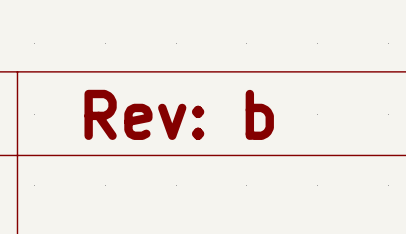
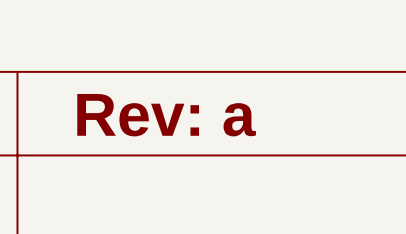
title block: Rev: b (179, 114) -> Rev: a (166, 115)

